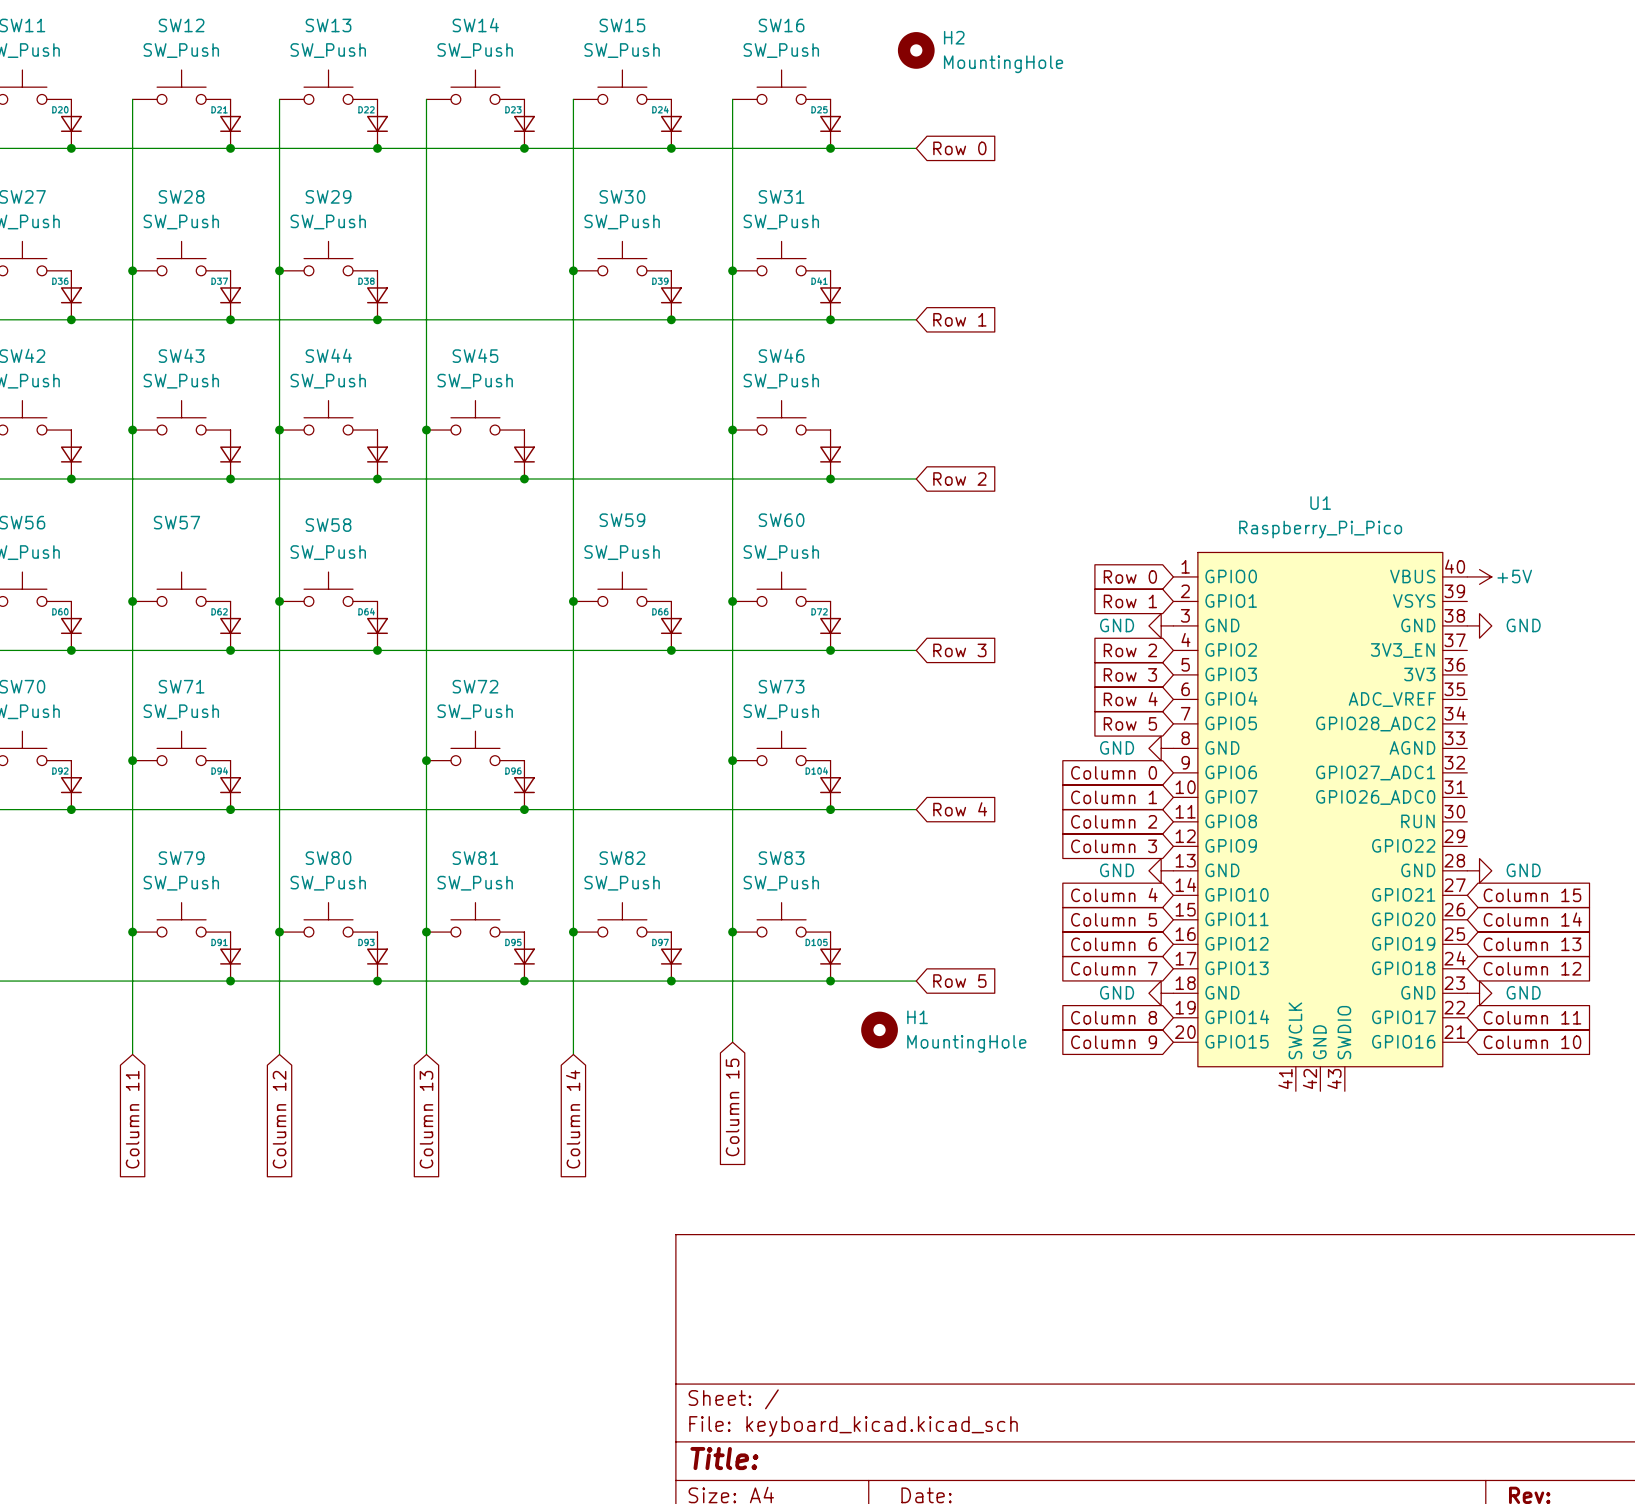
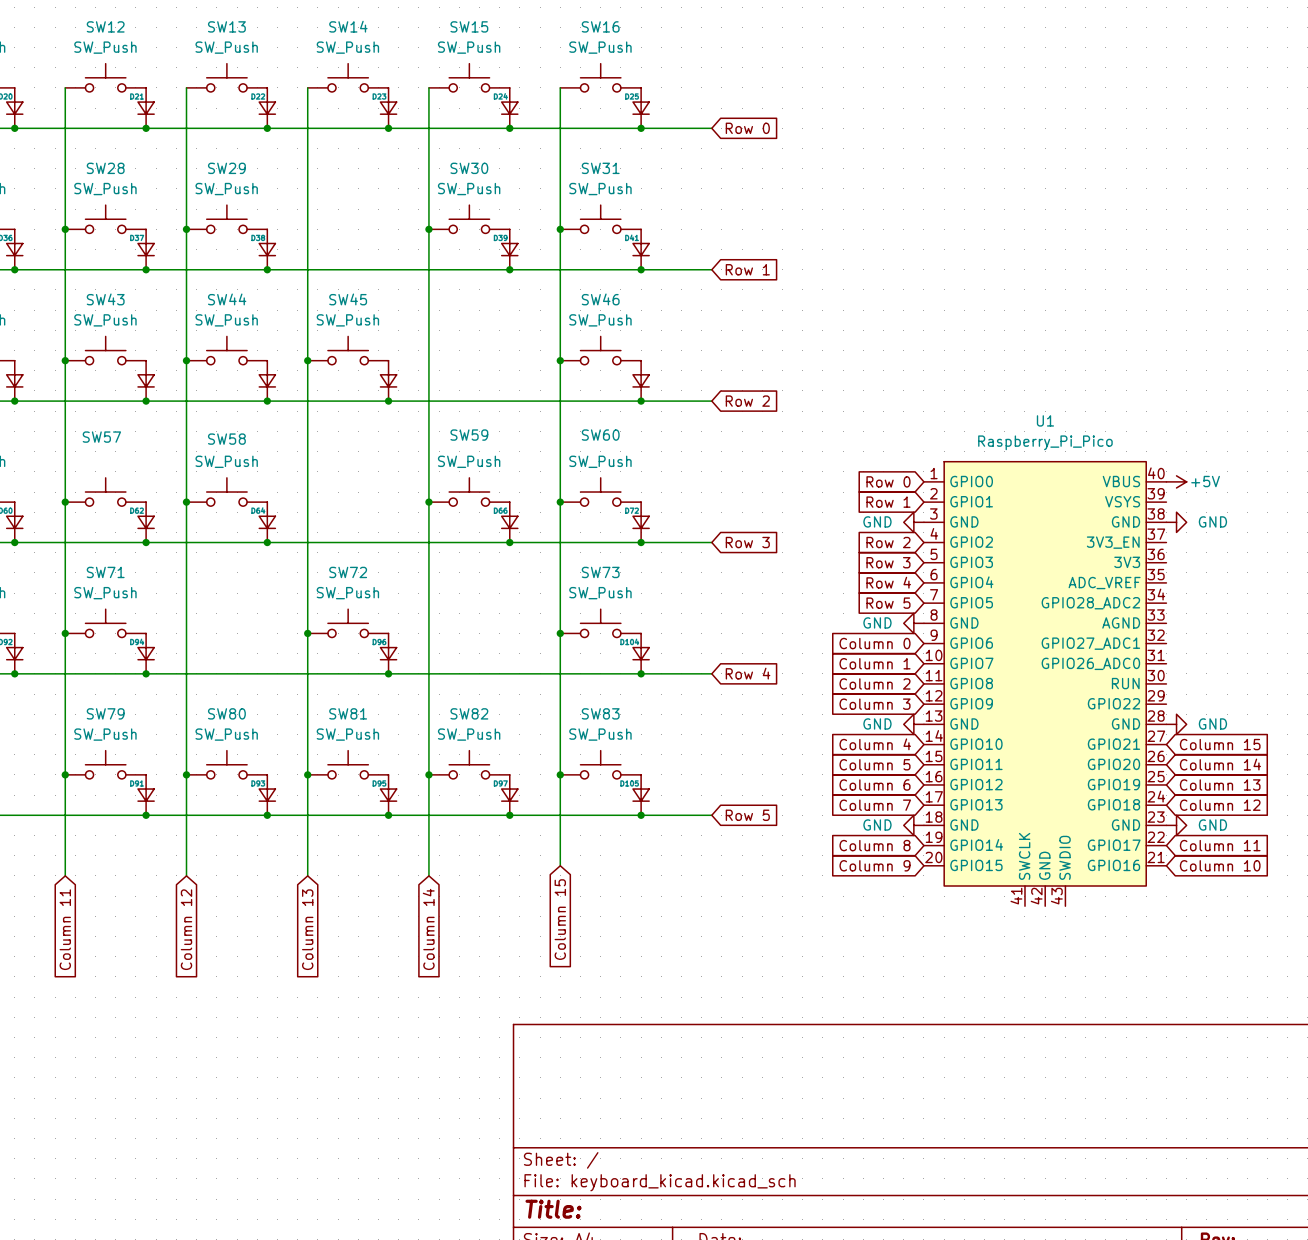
H2: MountingHole (916, 50) -> none
H1: MountingHole (879, 1030) -> none

